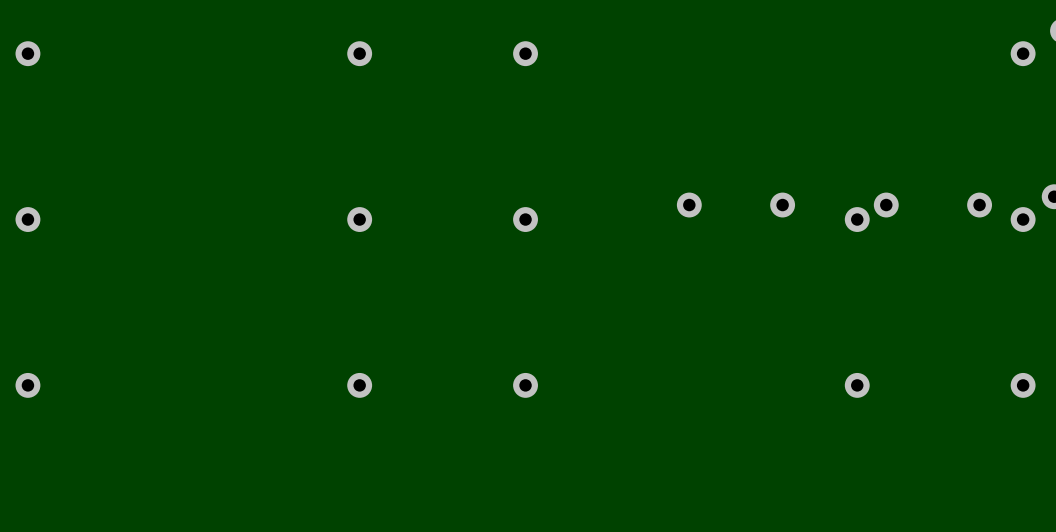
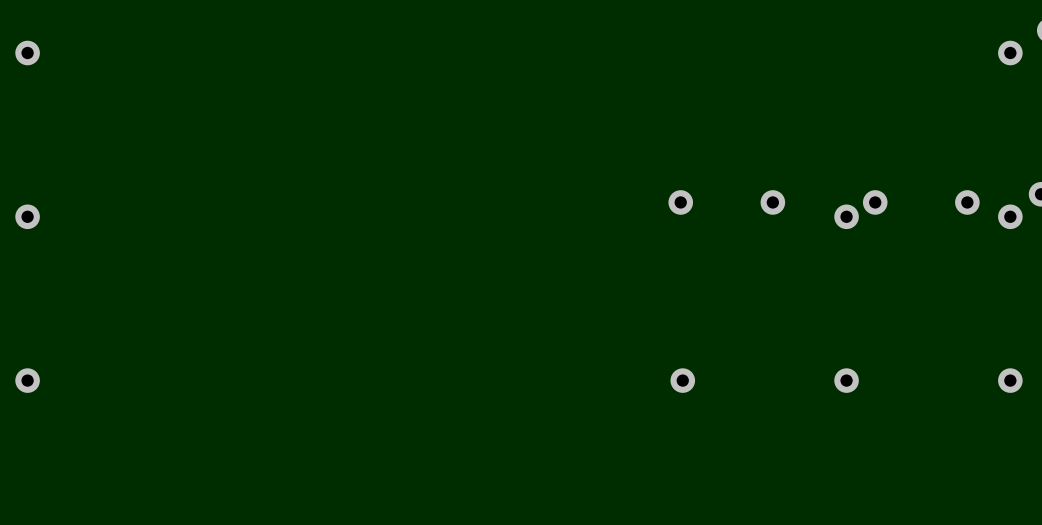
via: (359, 53) -> none
via: (525, 53) -> none
via: (359, 219) -> none
via: (525, 219) -> none
via: (359, 385) -> none
via: (525, 385) -> none
via: none -> (682, 380)

